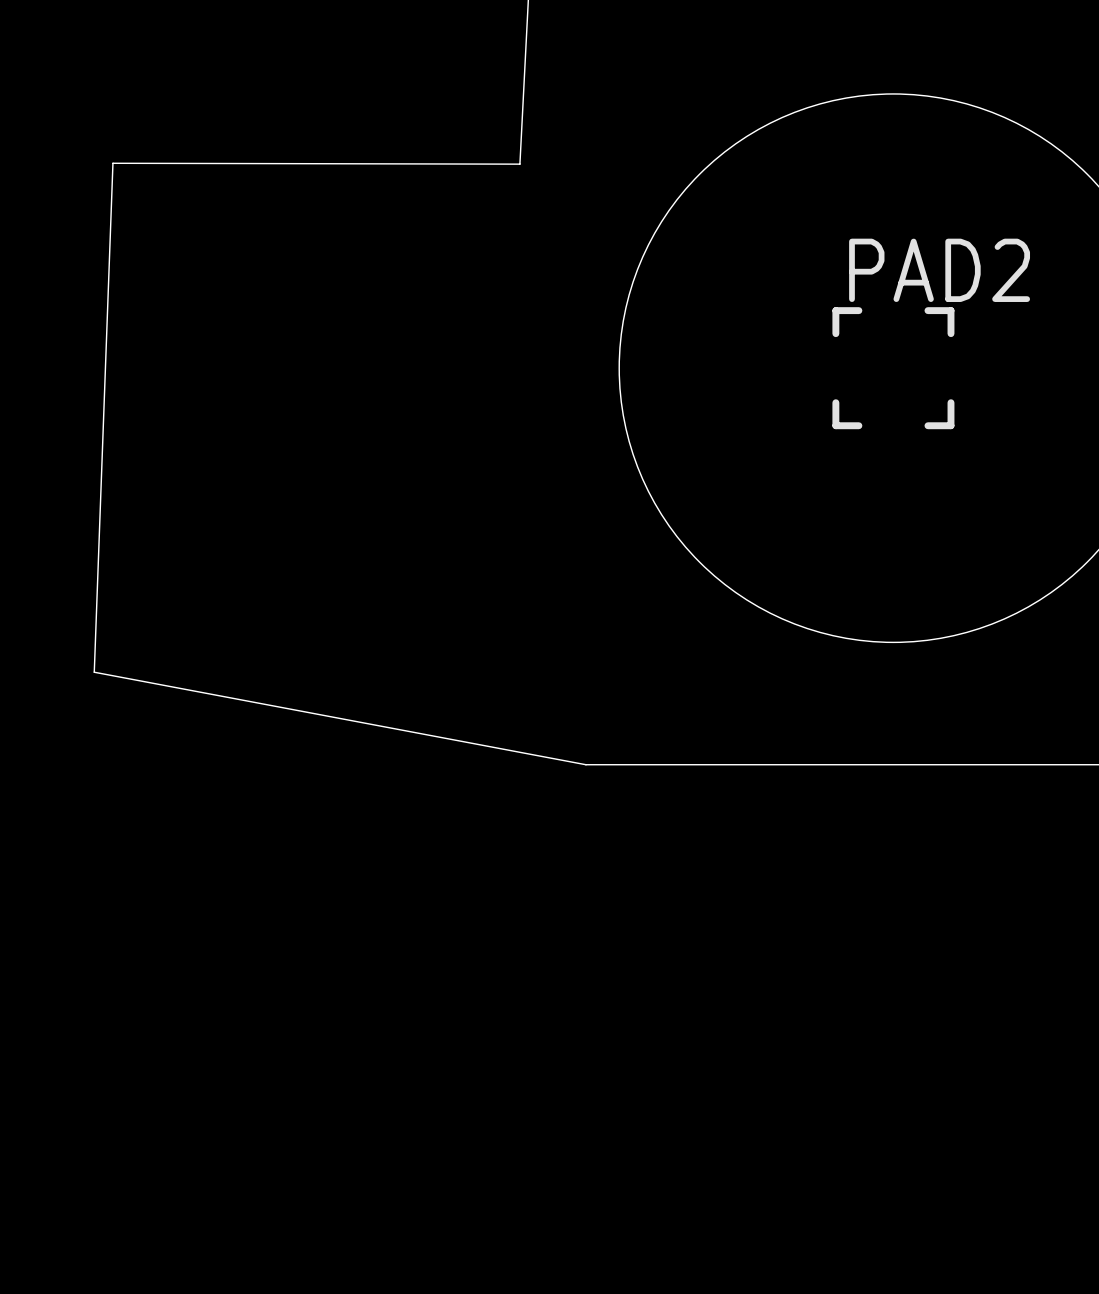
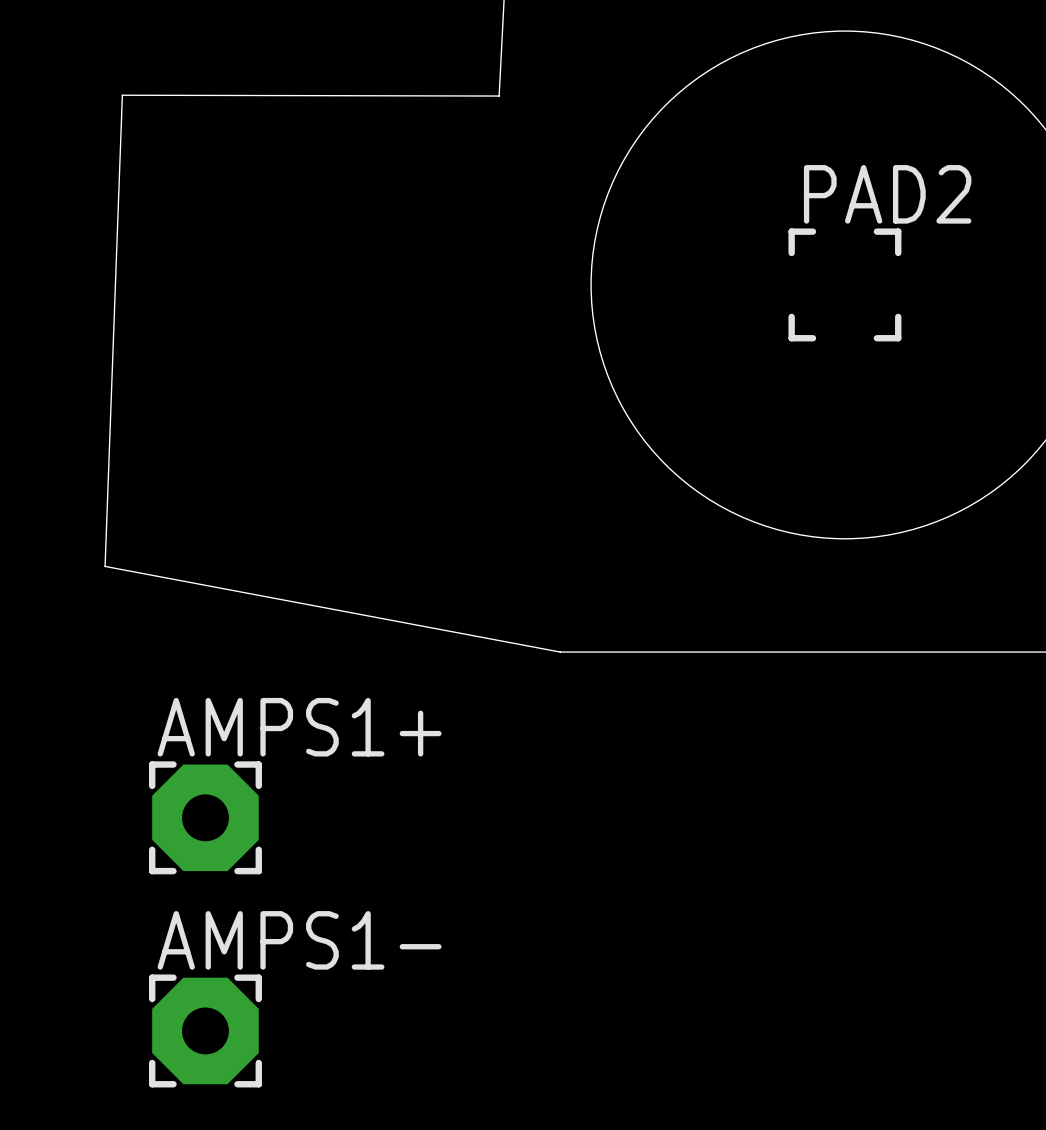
AMPS1+: none -> (205, 817)
AMPS1-: none -> (205, 1030)

